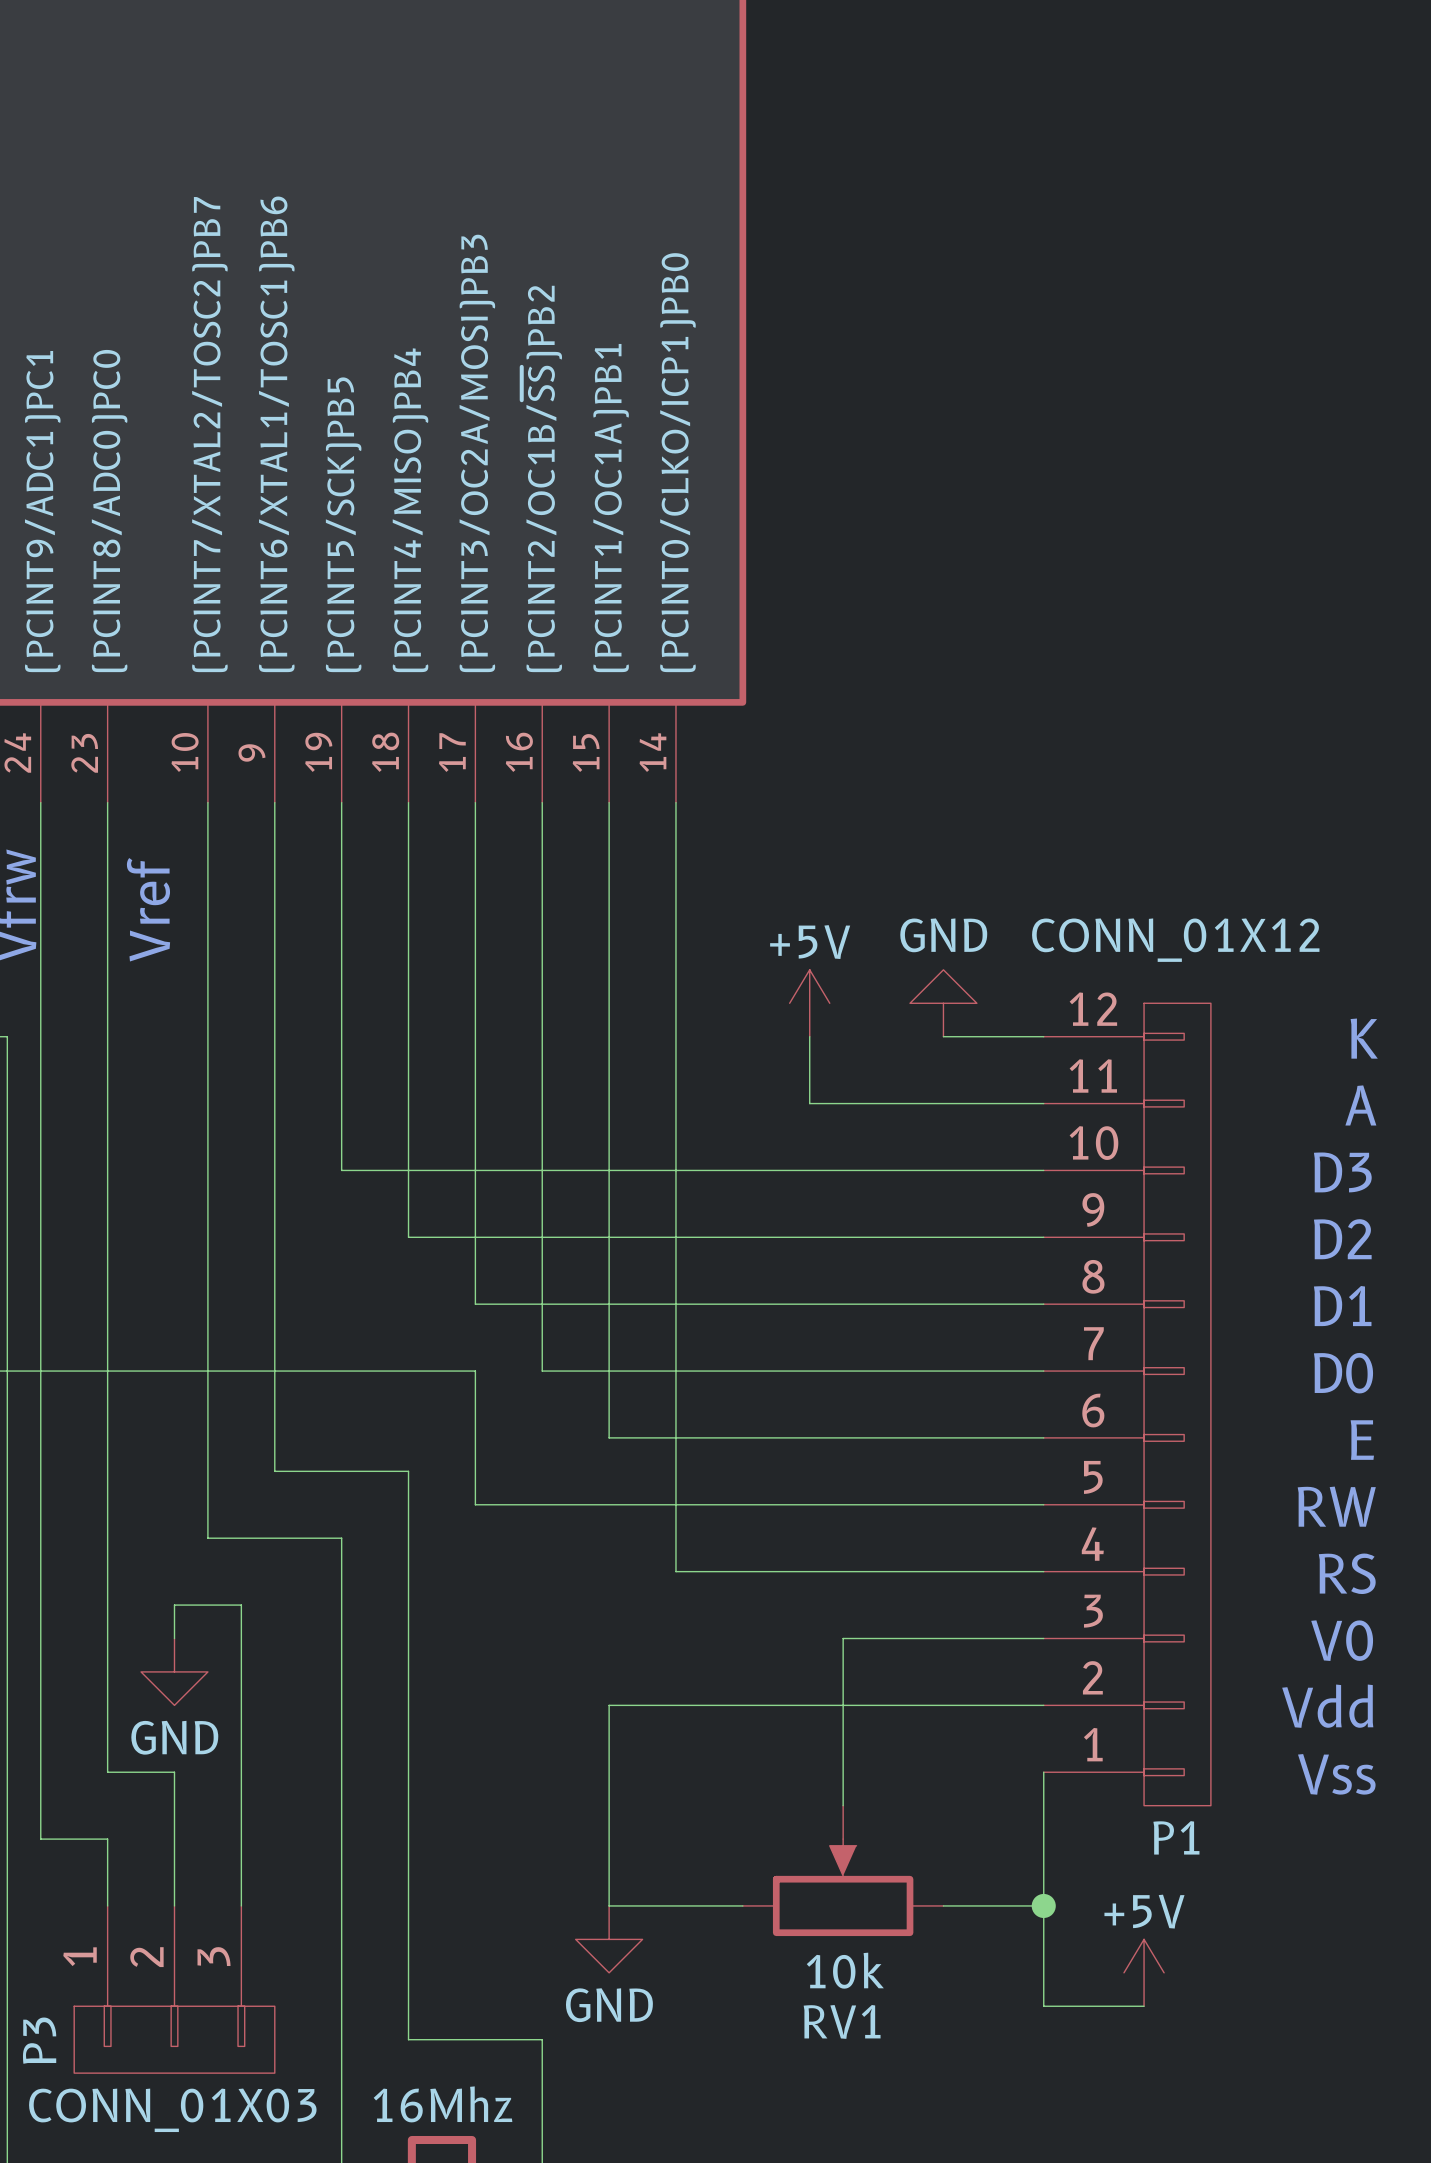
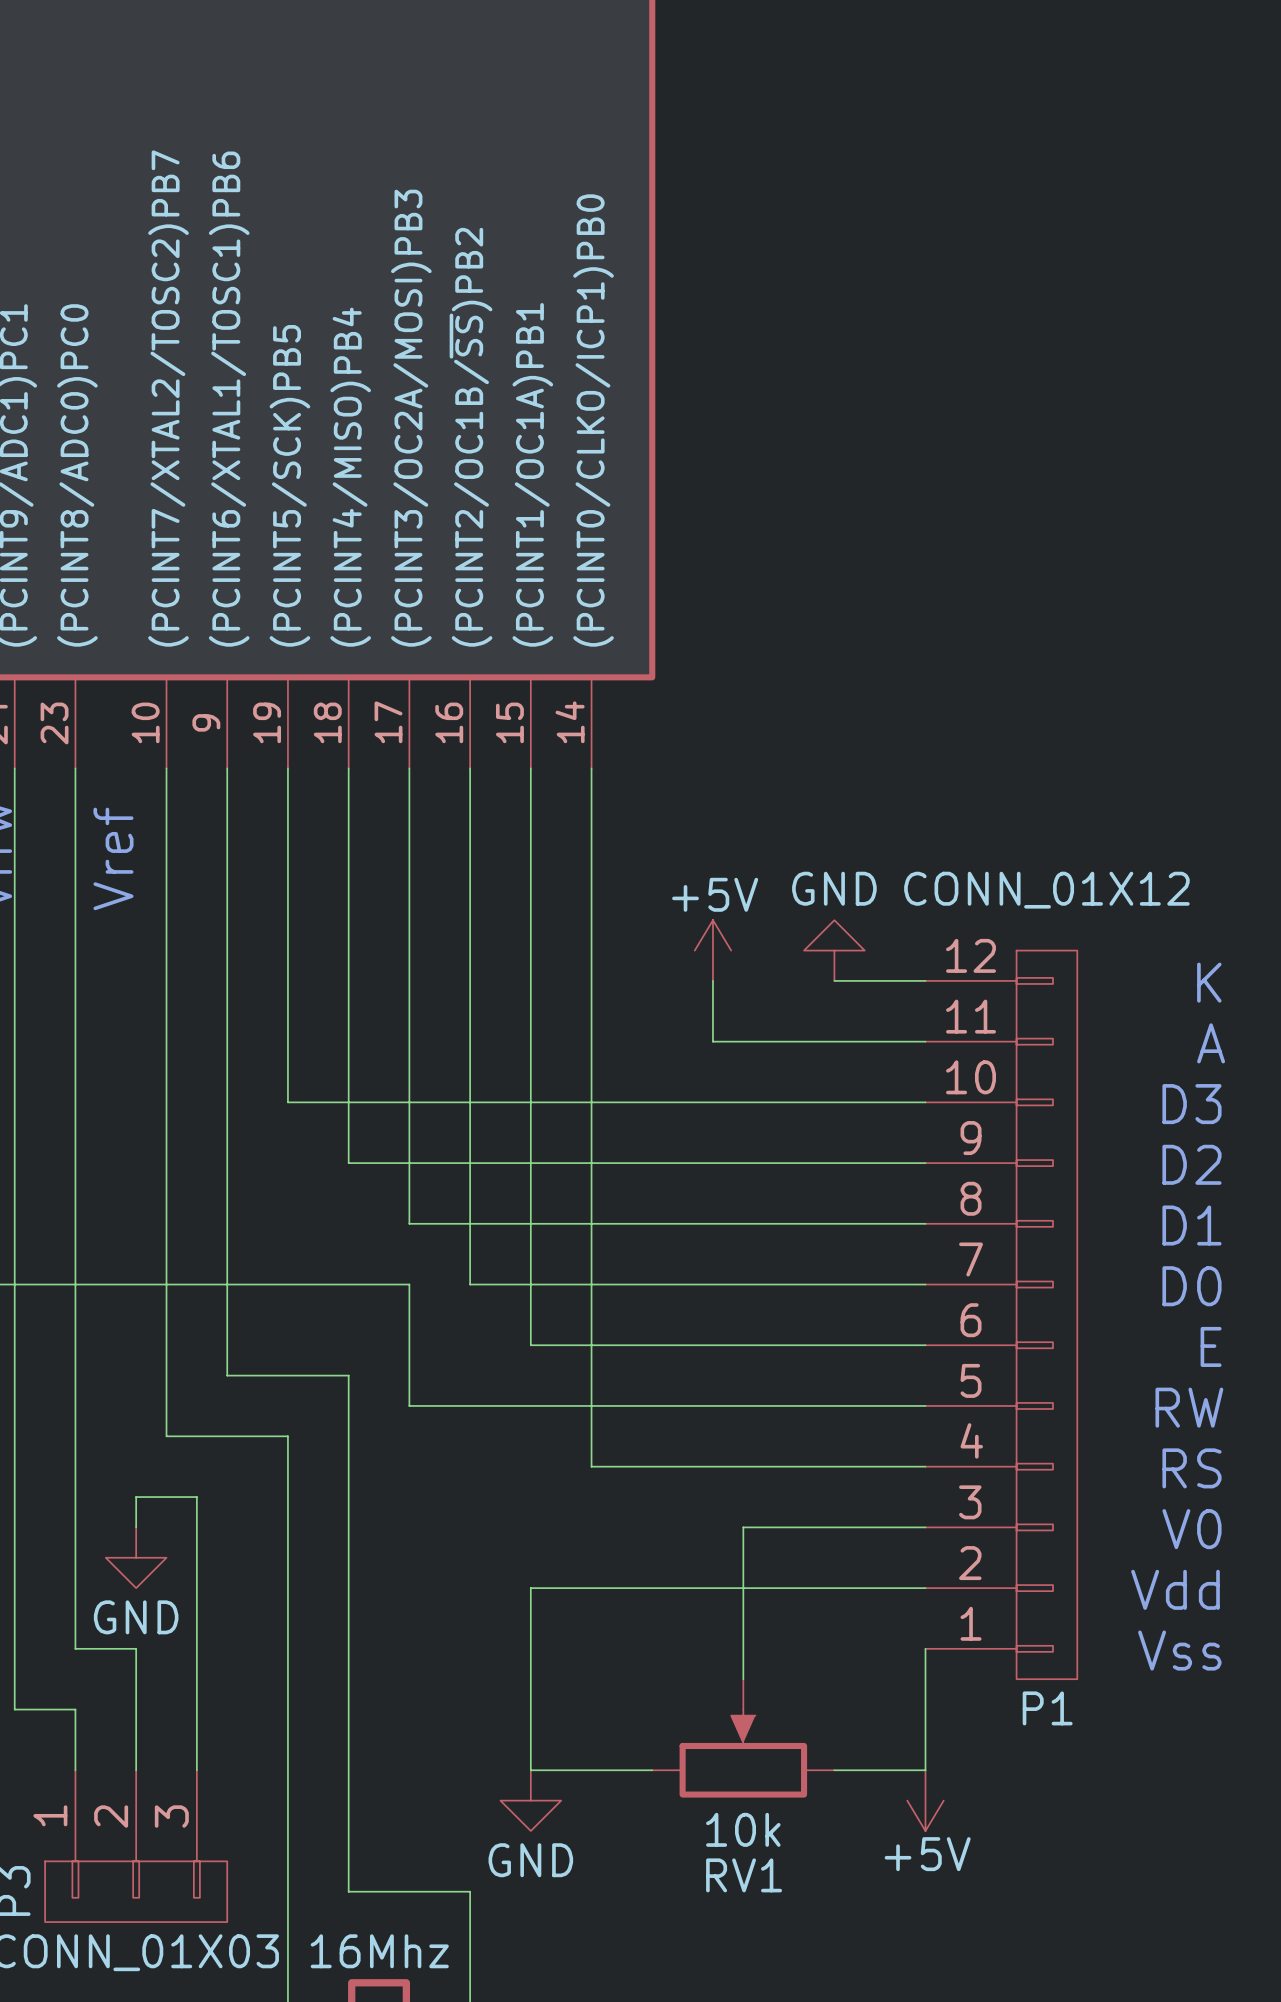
wire: (1043, 1905) (1043, 2006) (1144, 2006) -> none
junction: (1043, 1905) -> none
power symbol rotation: 0° (1144, 1972) -> 180° (925, 1800)
power symbol position: +5V (1144, 1972) -> +5V (925, 1800)

